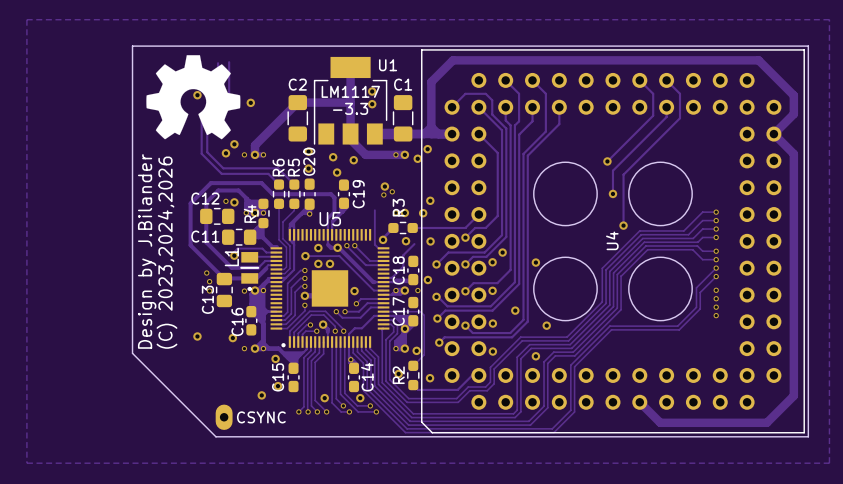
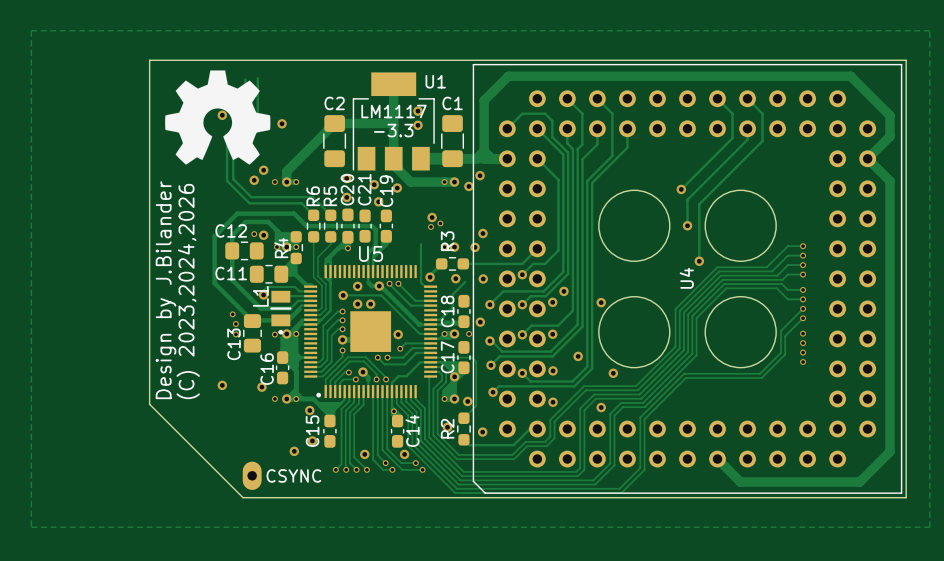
C21: none -> (365, 226)
C19 name position: C19 (358, 194) -> C19 (386, 191)

